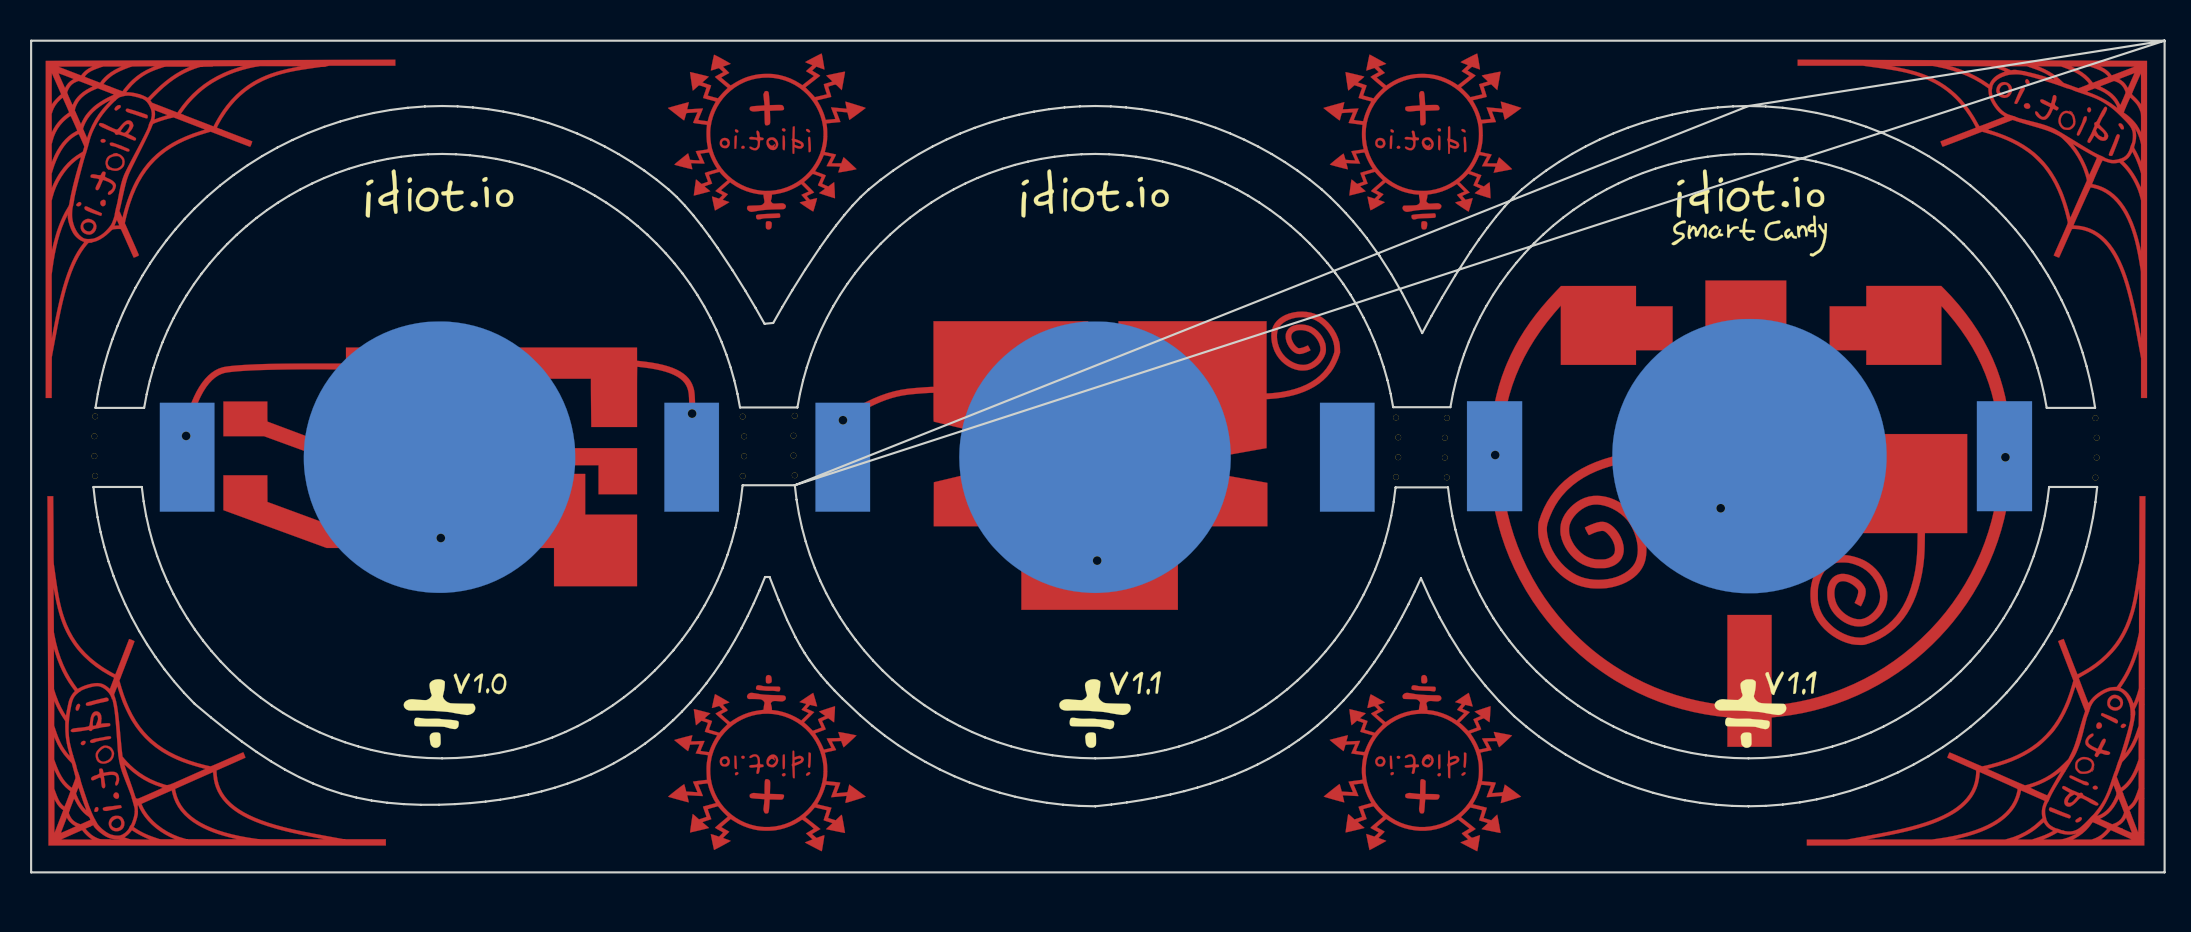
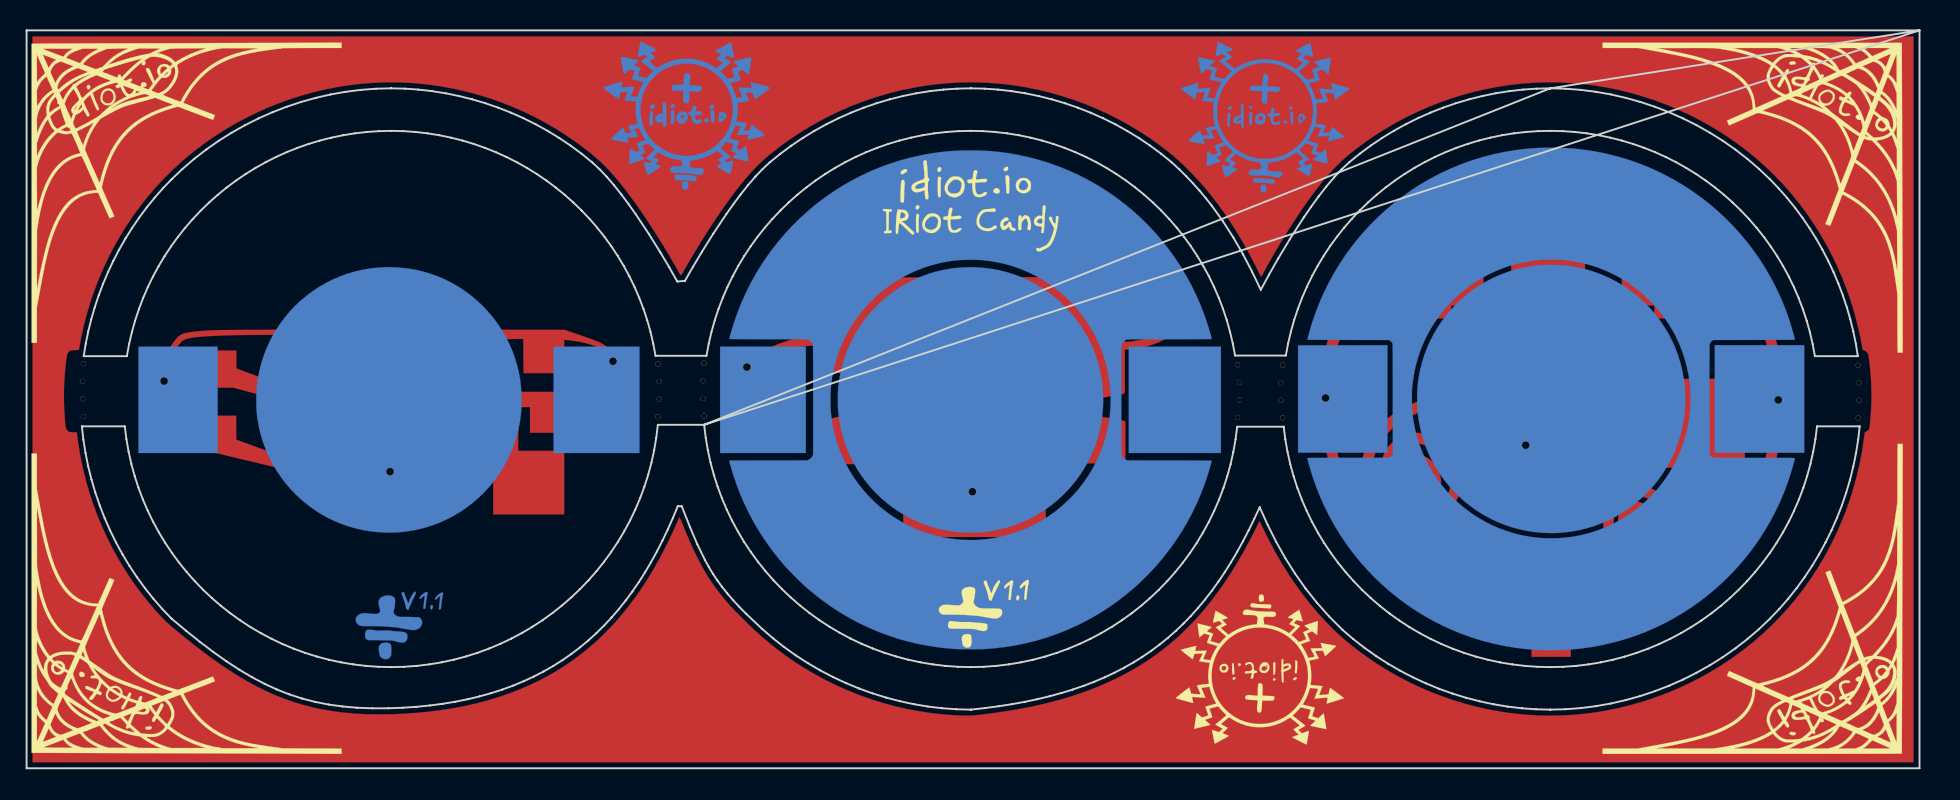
drawing: none -> [31, 36, 1914, 763]
drawing: [45, 53, 2148, 852] -> none

